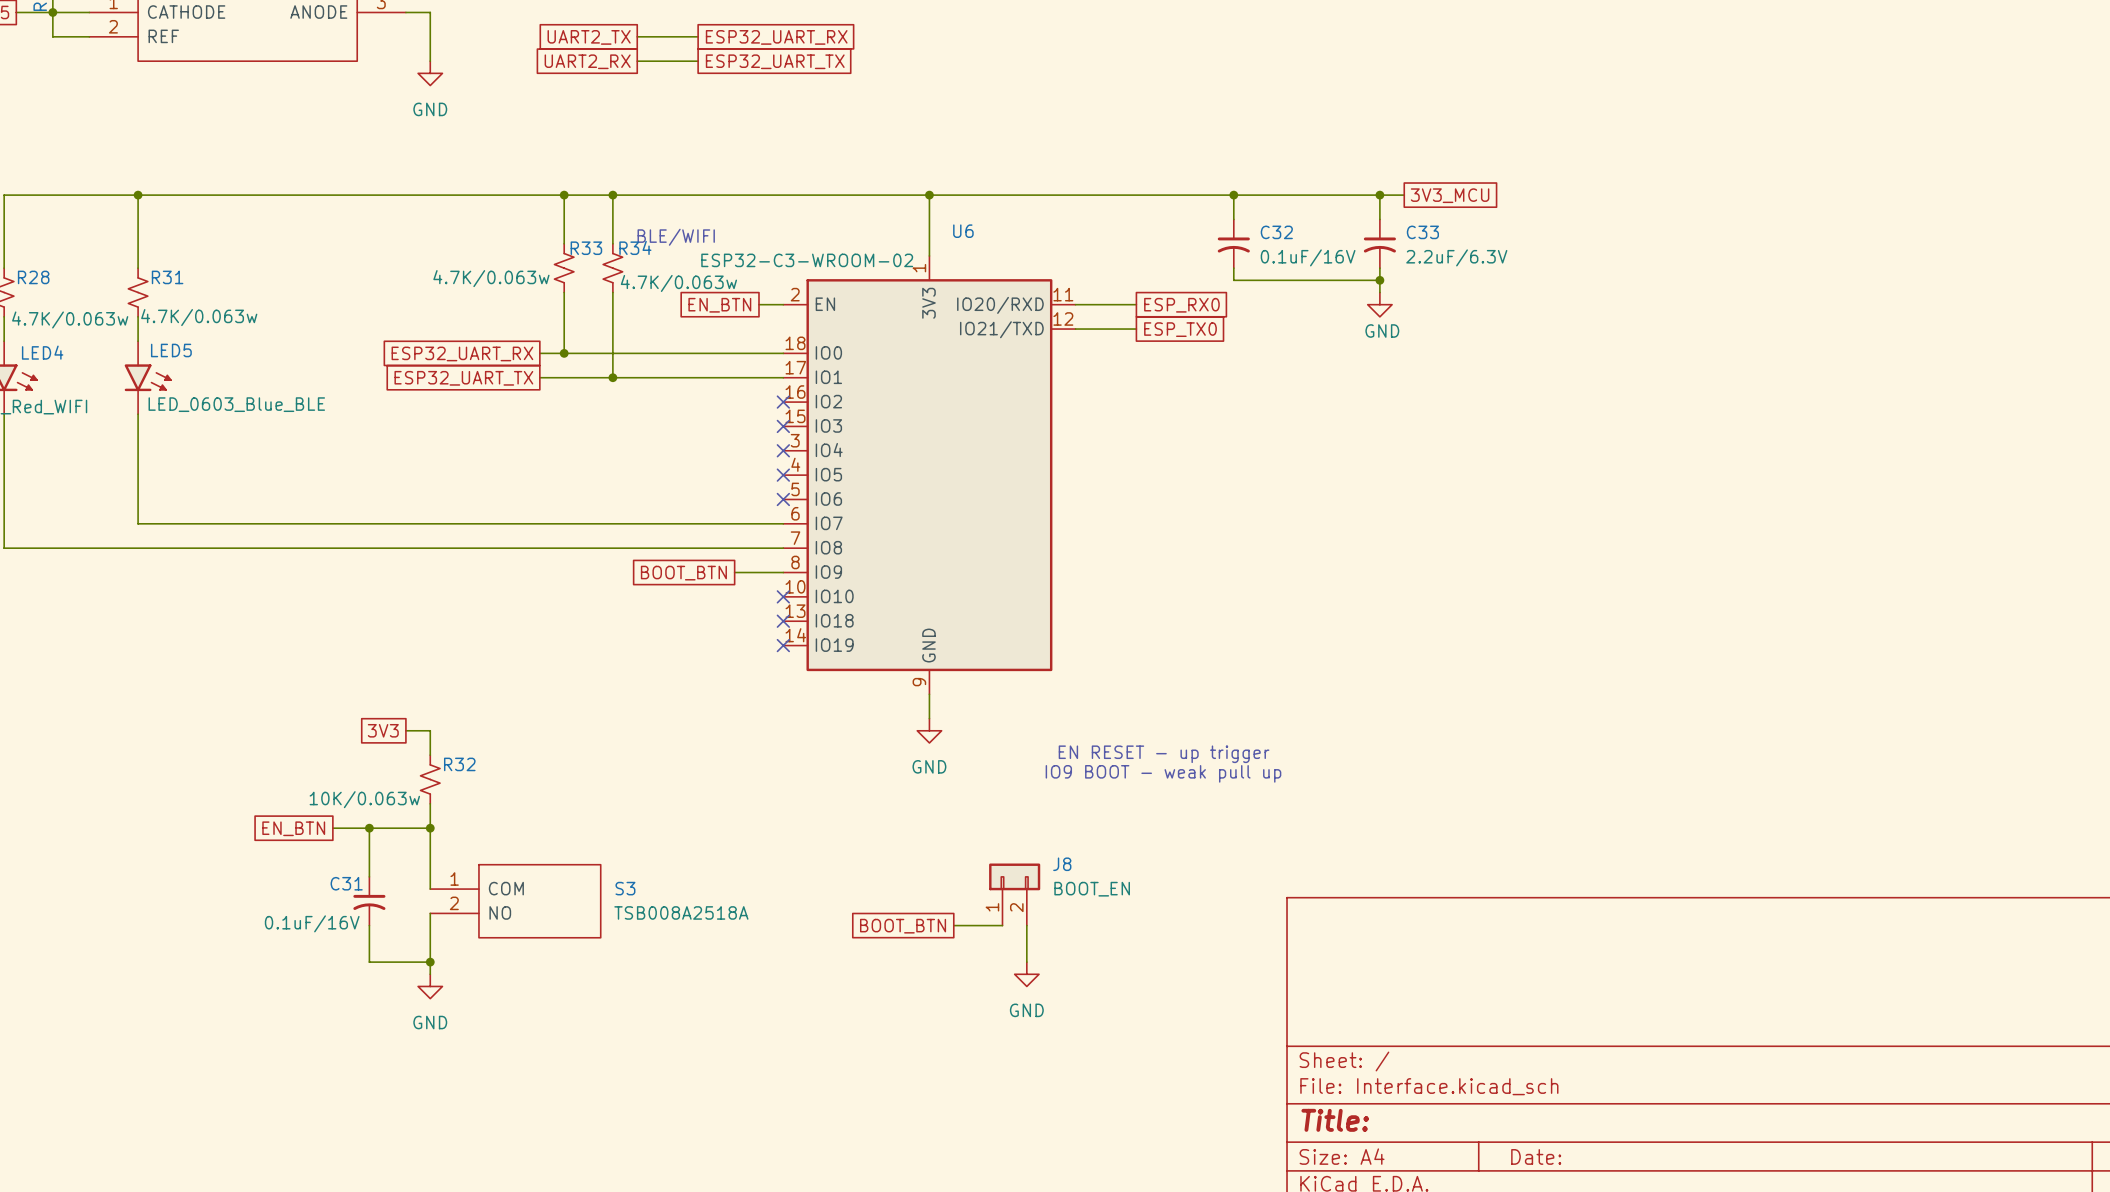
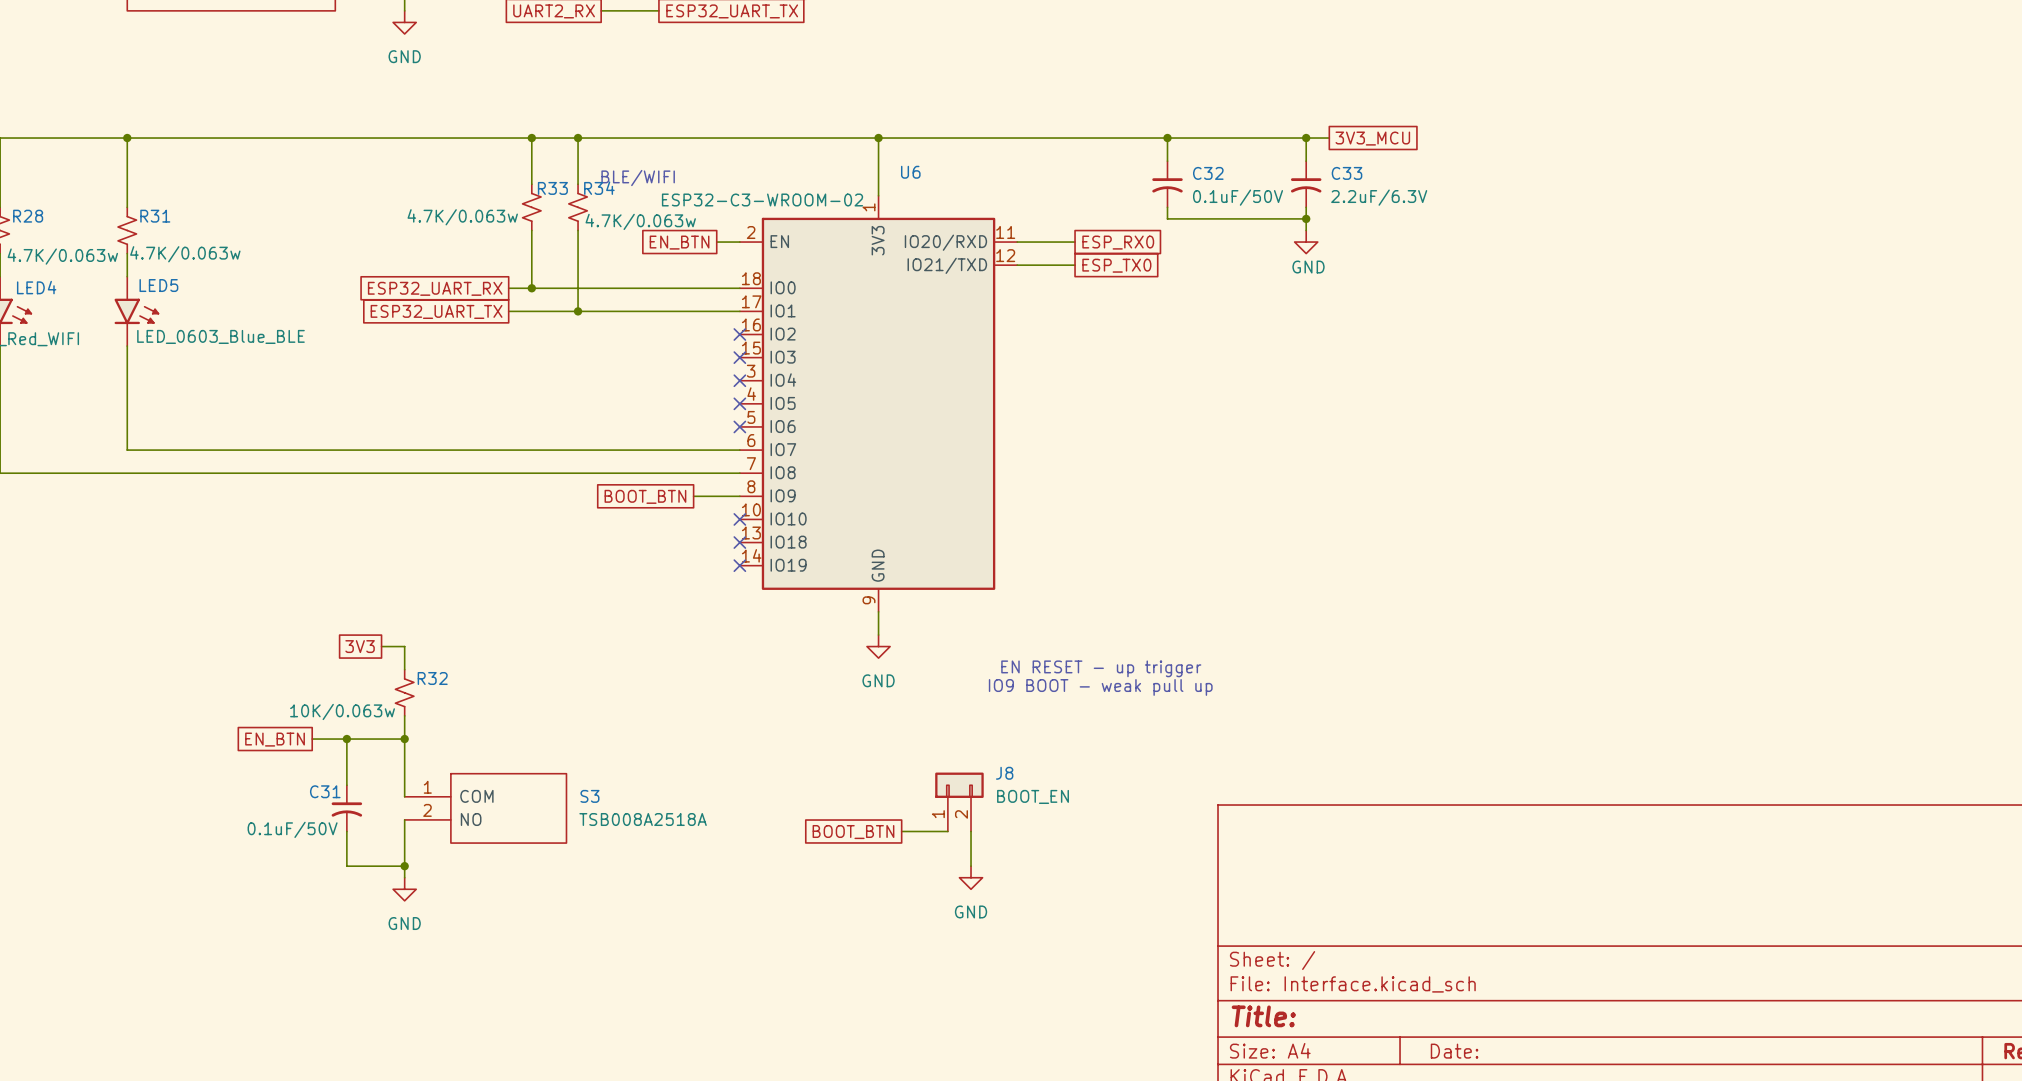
C32 value: 0.1uF/16V (1308, 257) -> 0.1uF/50V (1238, 197)
C31 value: 0.1uF/16V (312, 923) -> 0.1uF/50V (292, 829)

